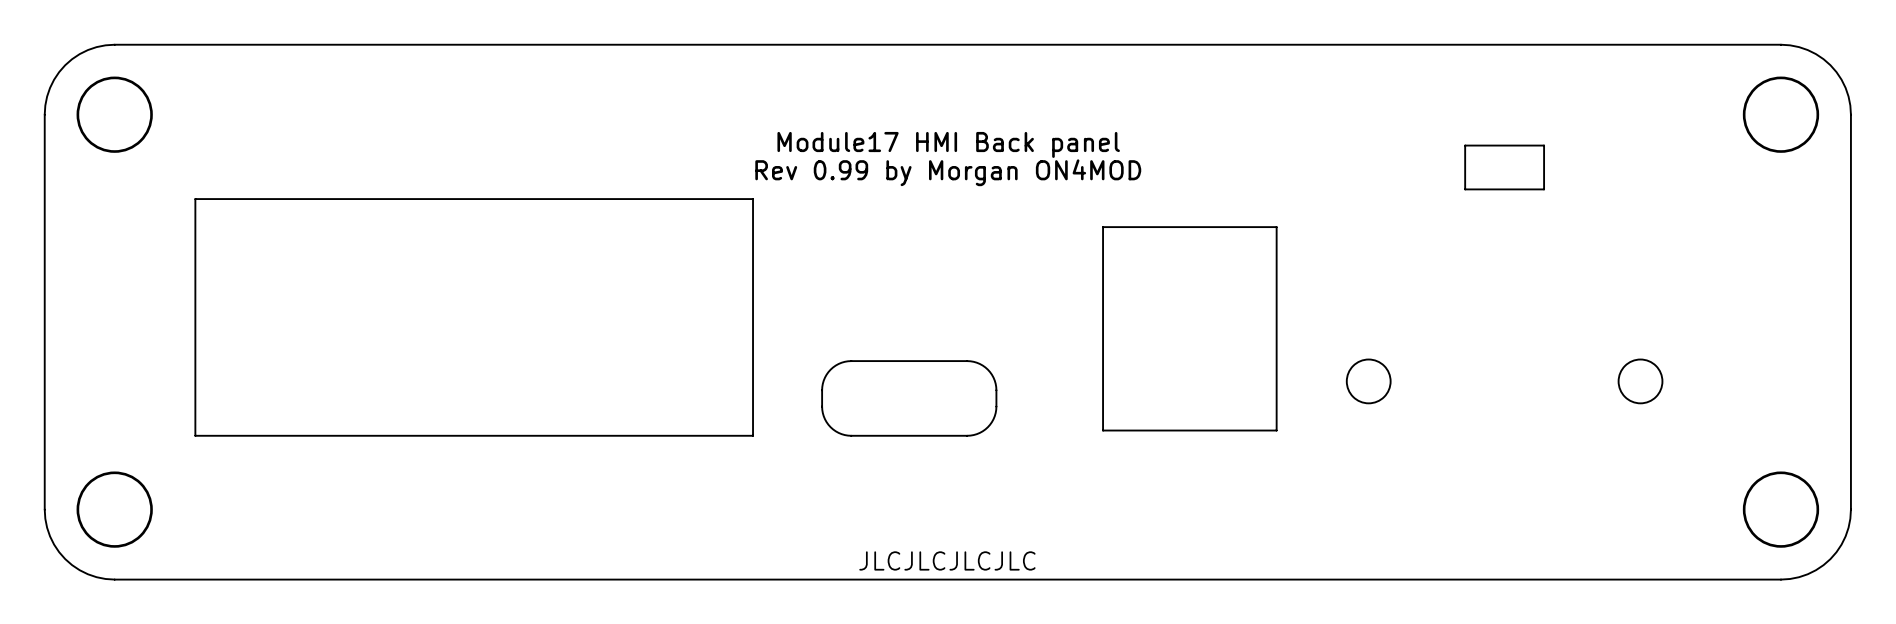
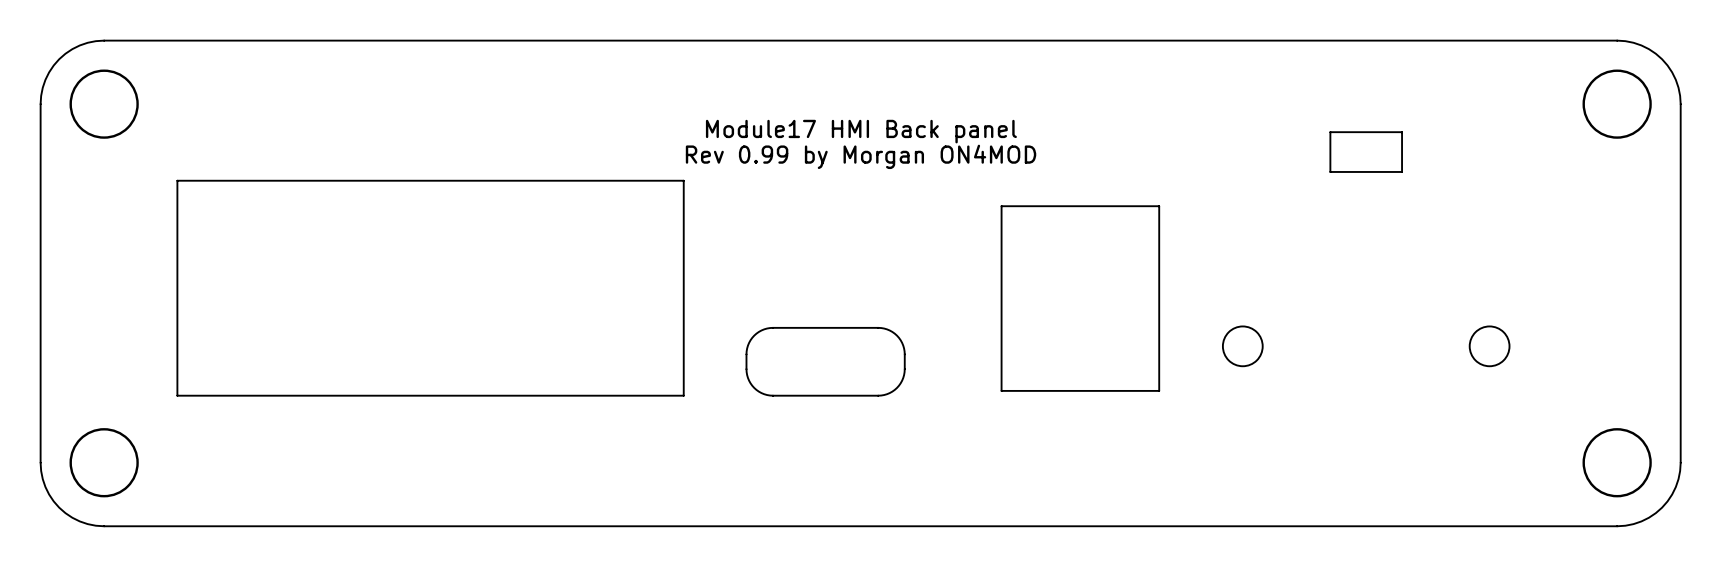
text: JLCJLCJLCJLC (947, 560) -> none

